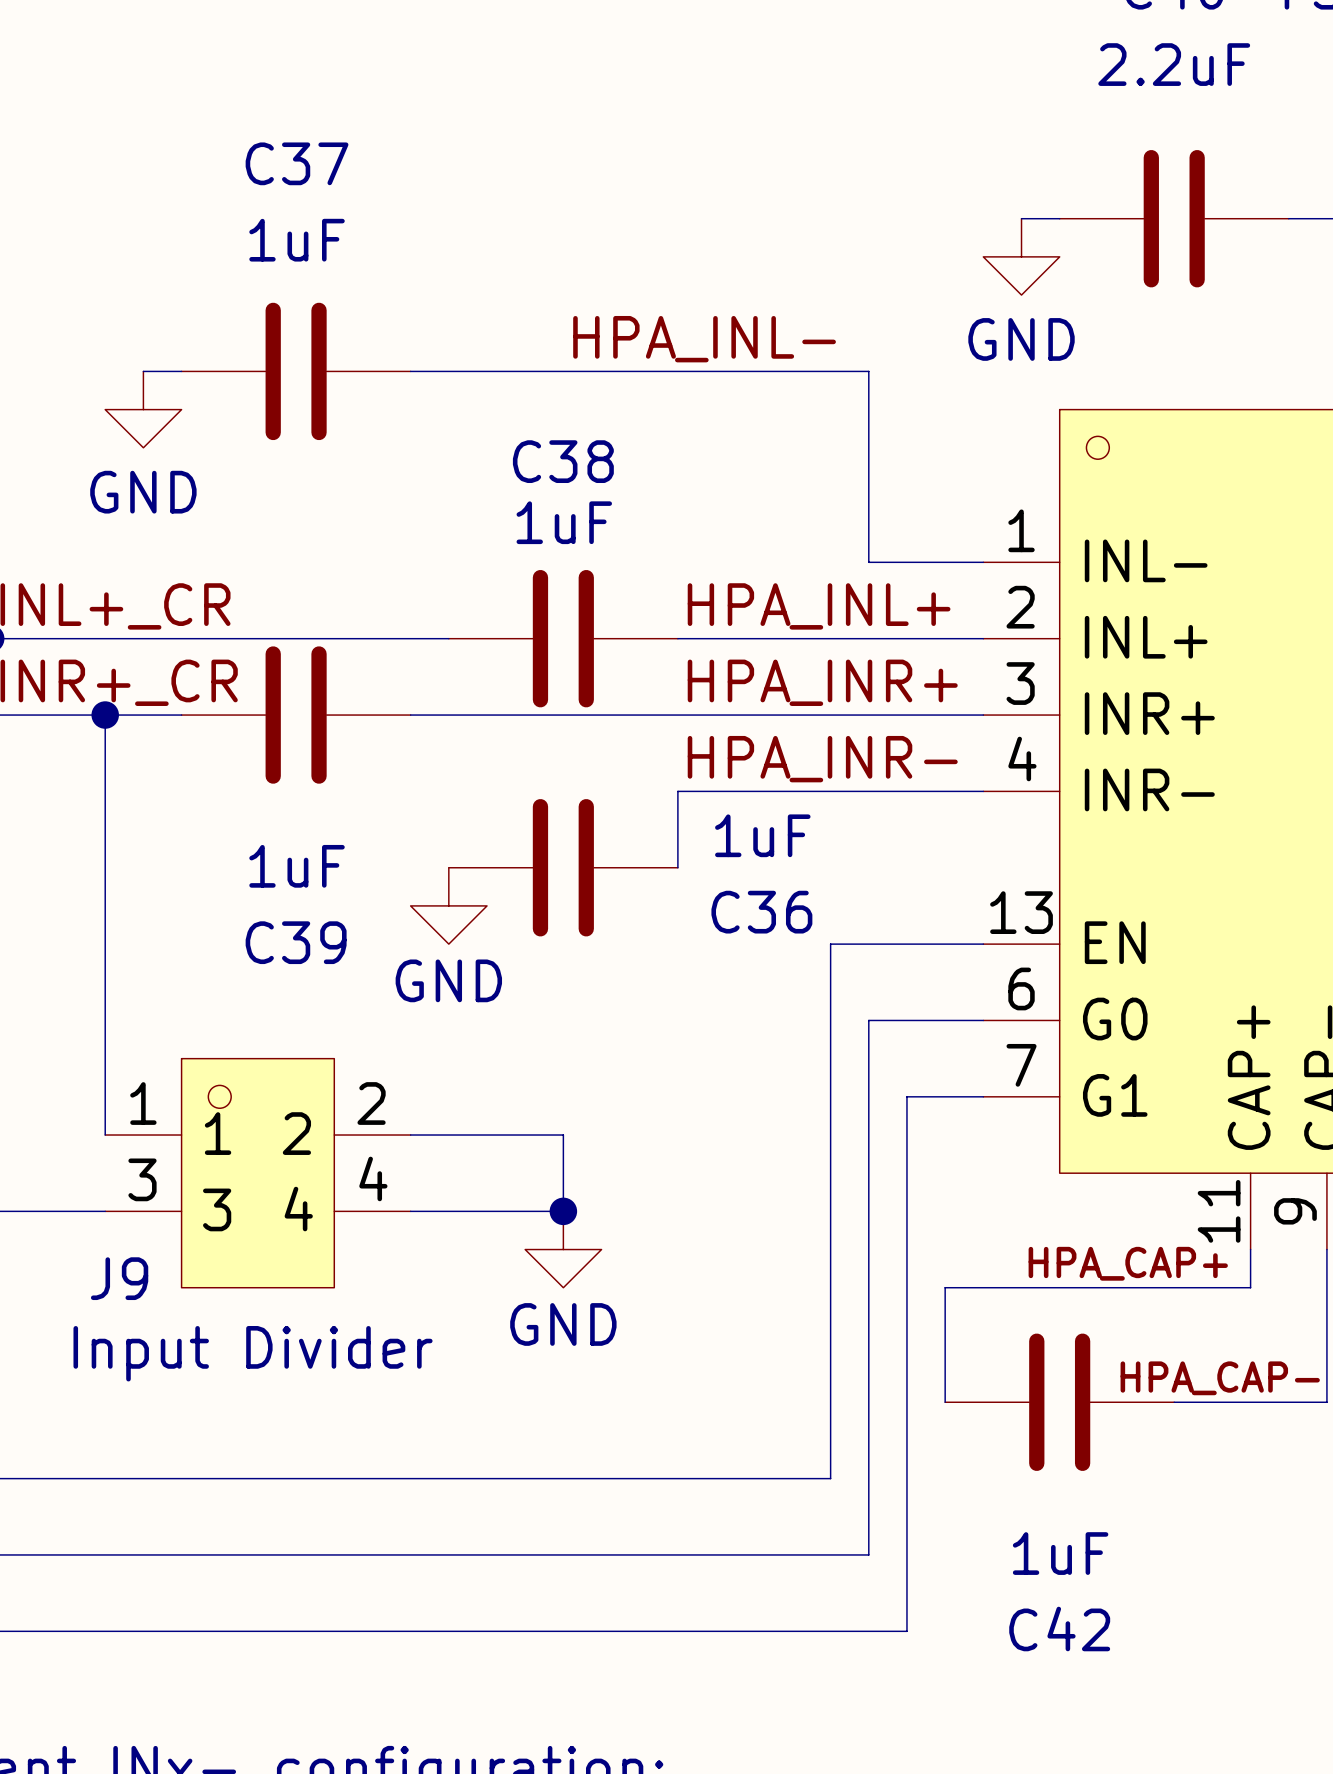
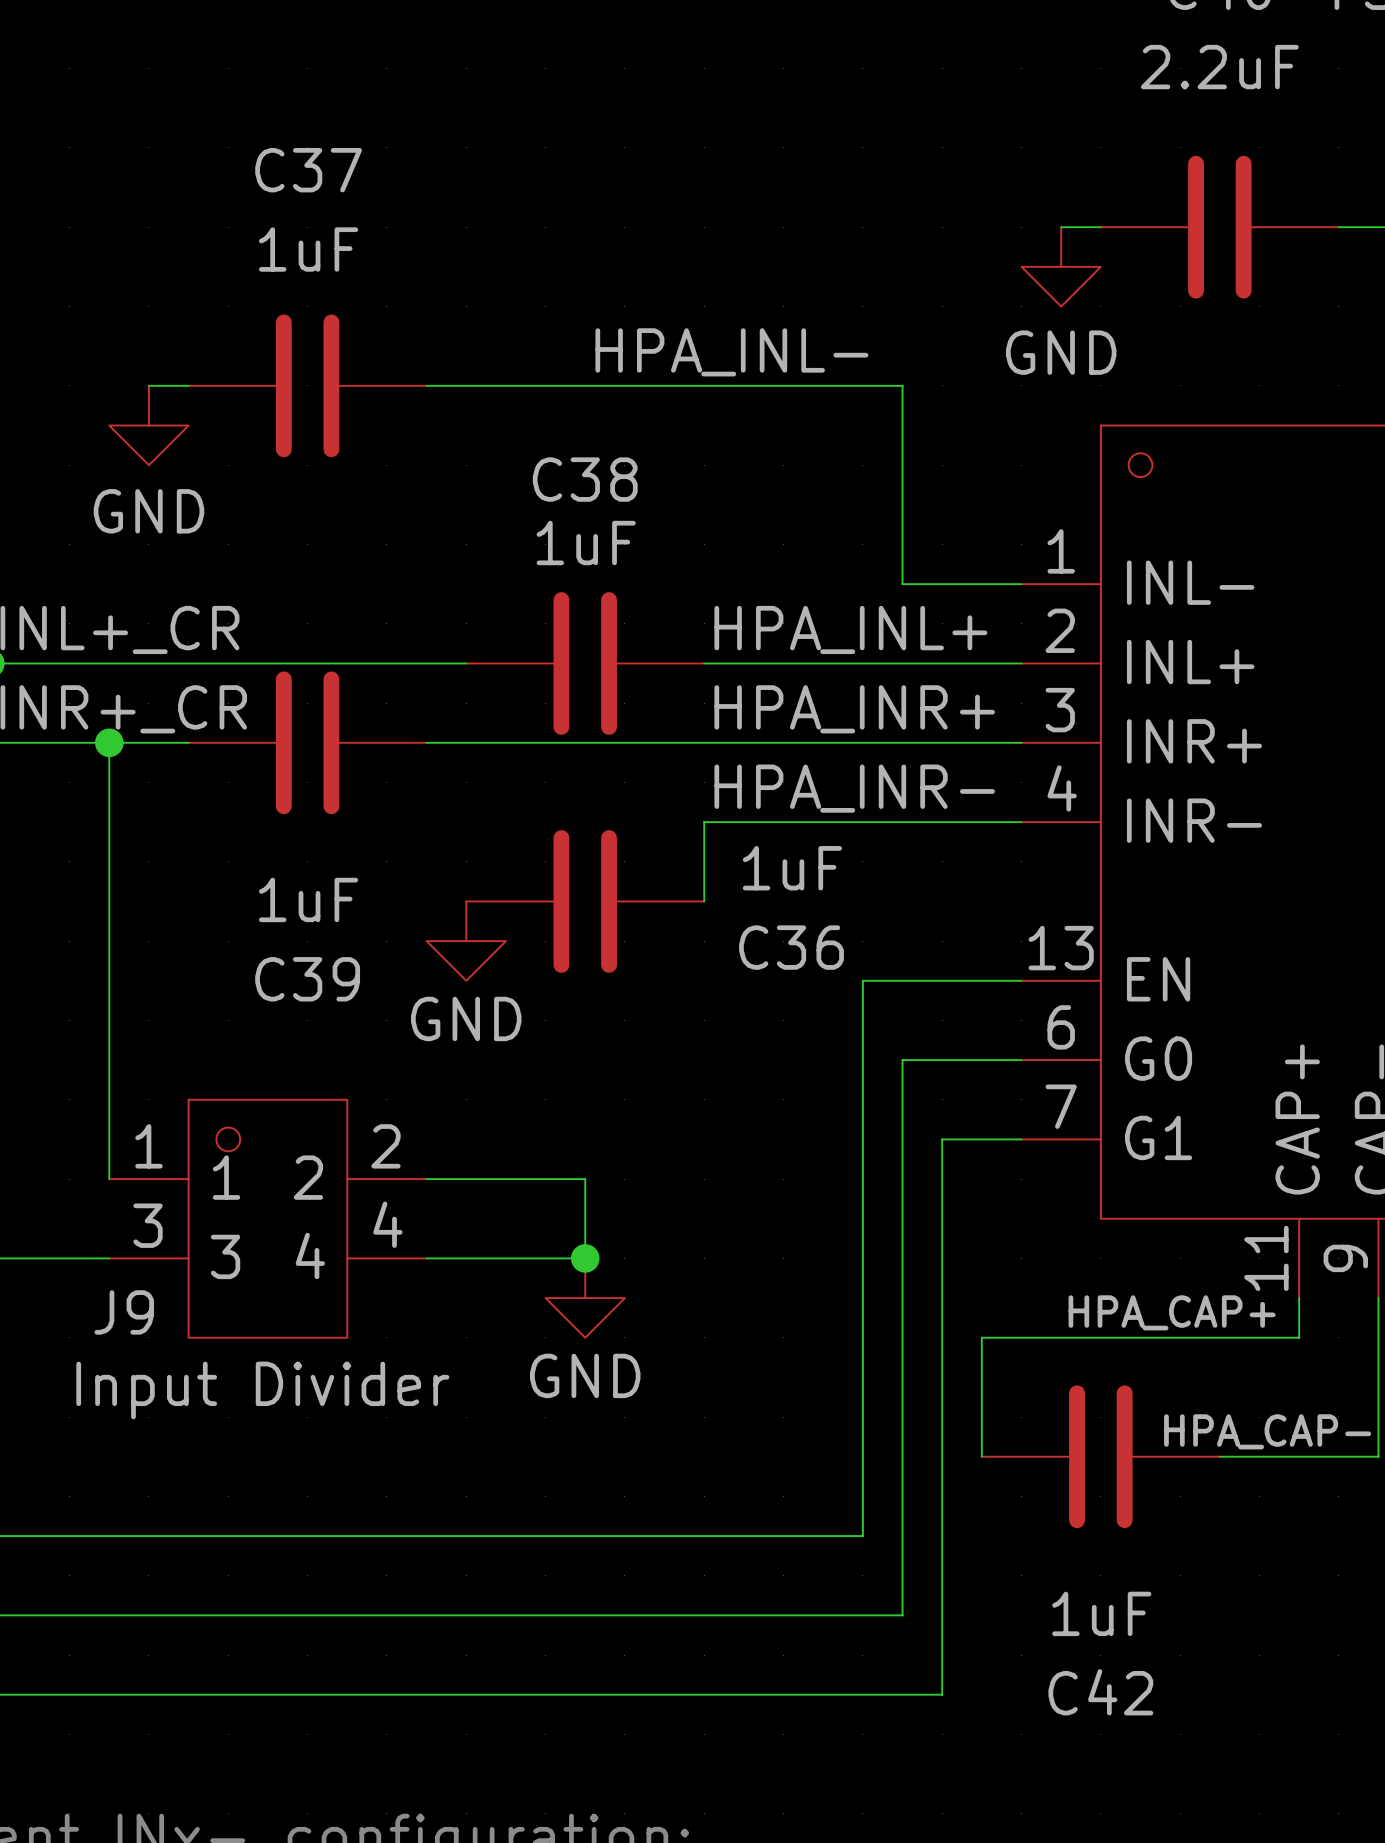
J9 name position: J9 (119, 1278) -> J9 (124, 1312)
J9 value position: Input Divider (253, 1353) -> Input Divider (262, 1390)

